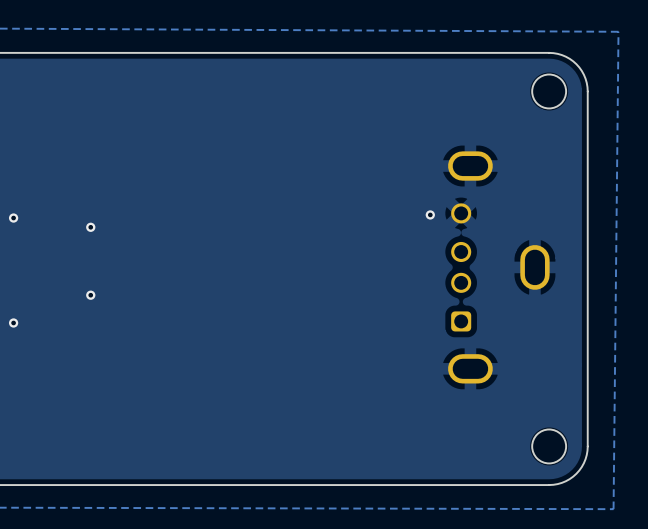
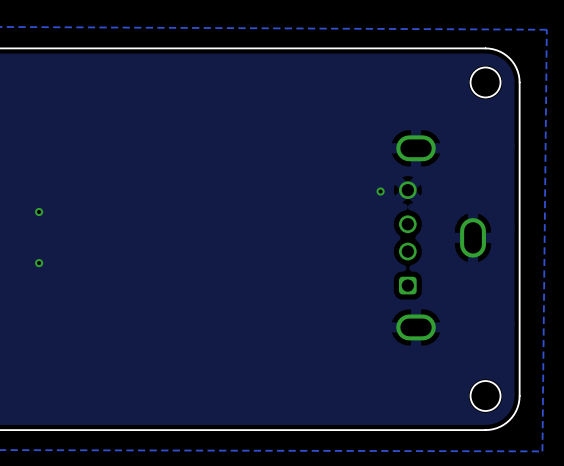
via: (13, 218) -> none
via: (90, 227) -> none
via: none -> (39, 211)
via: none -> (39, 263)
via: (90, 295) -> none
via: (13, 322) -> none

